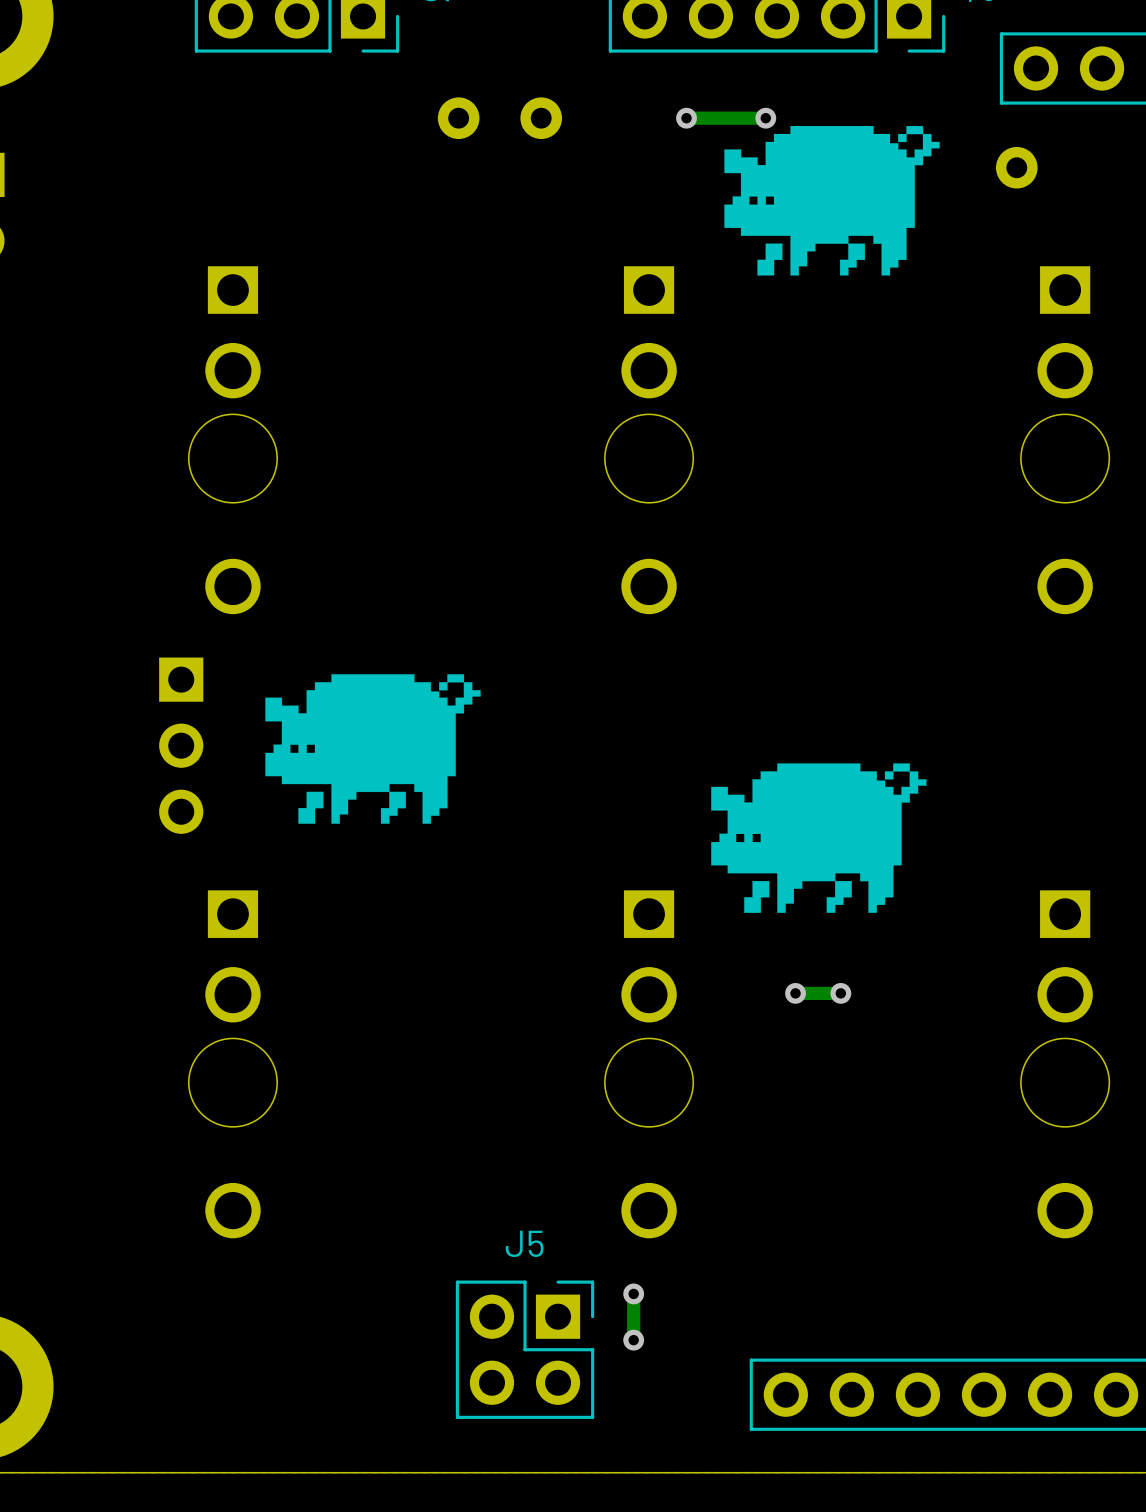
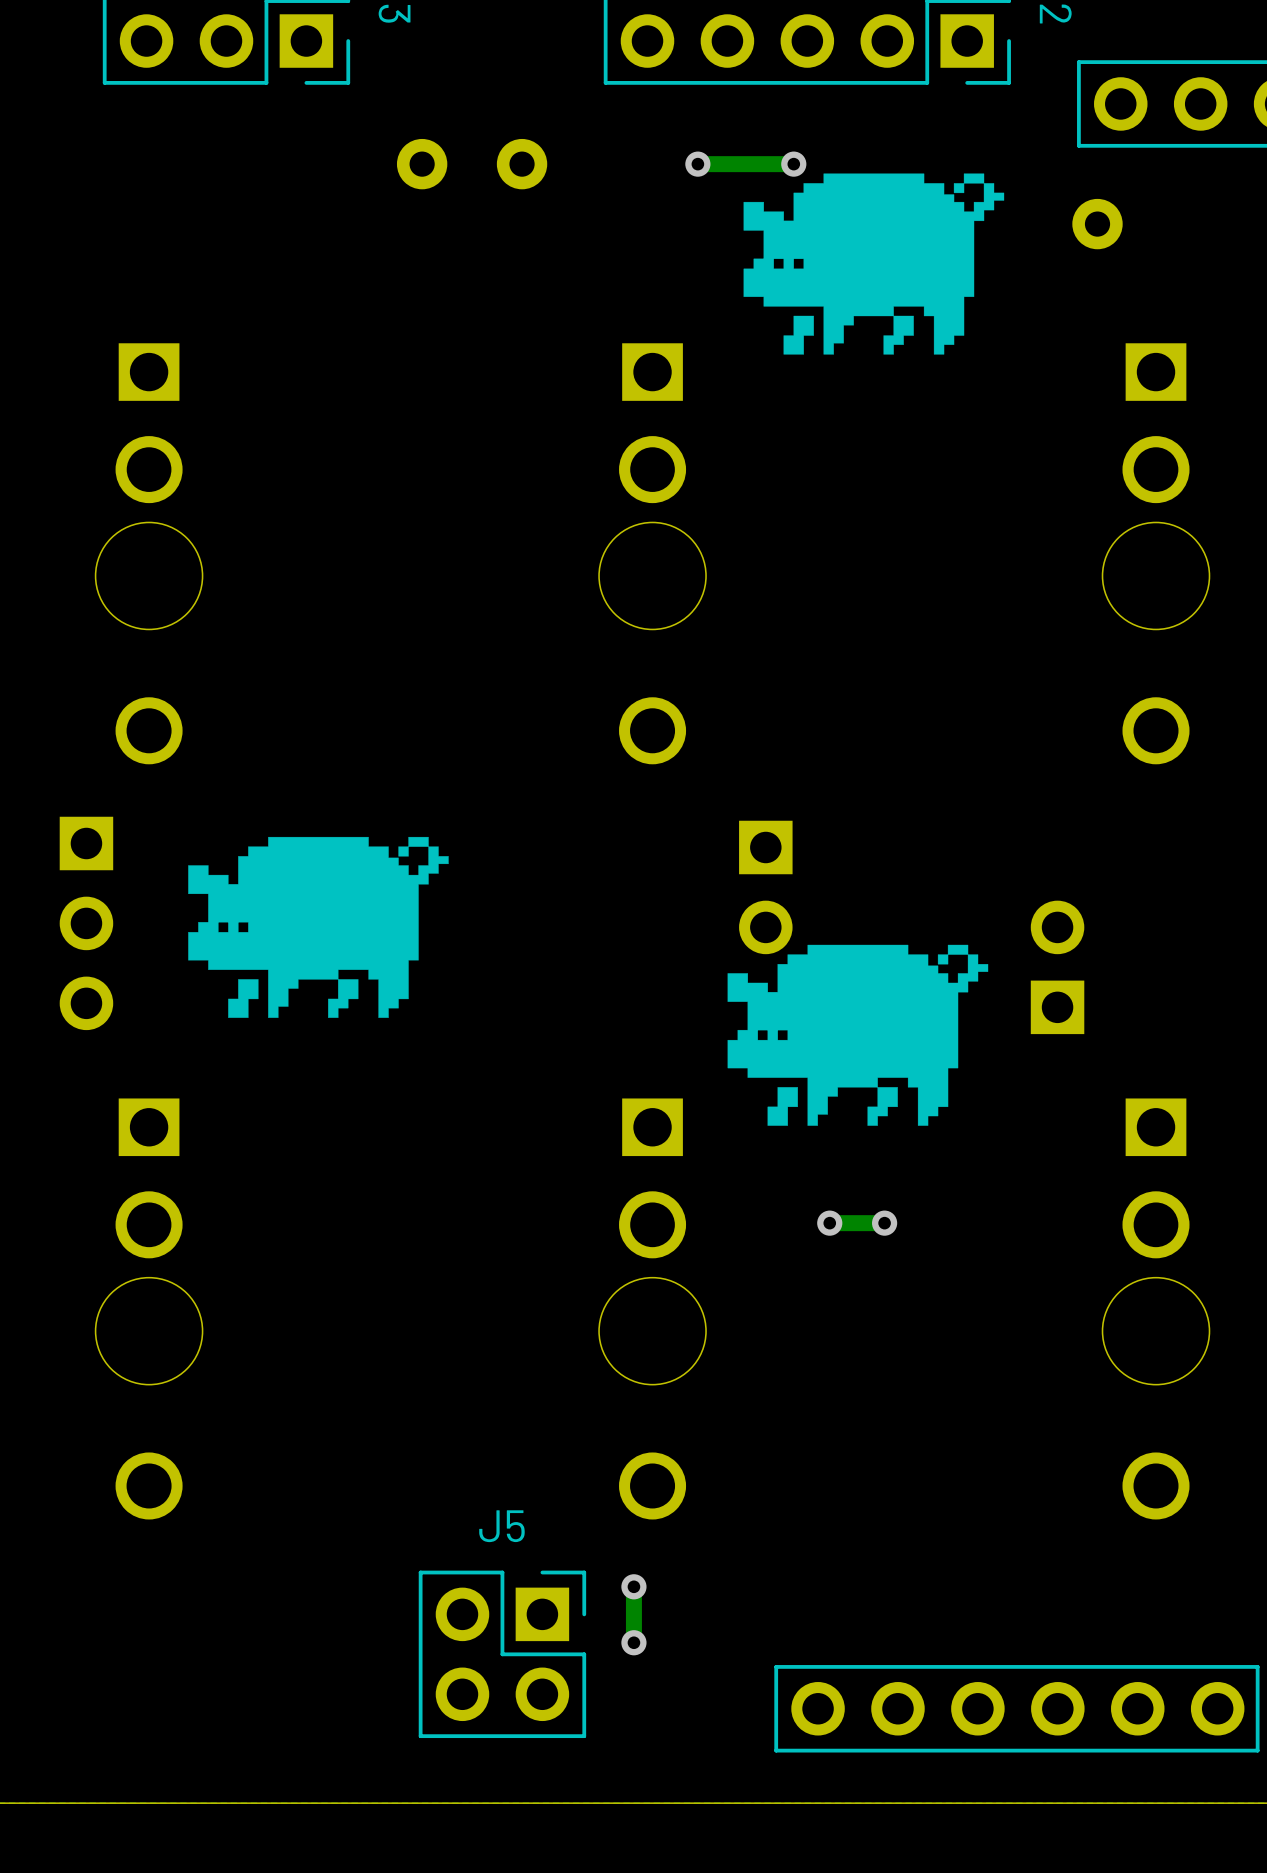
part: none -> (765, 887)
part: none -> (1057, 967)

